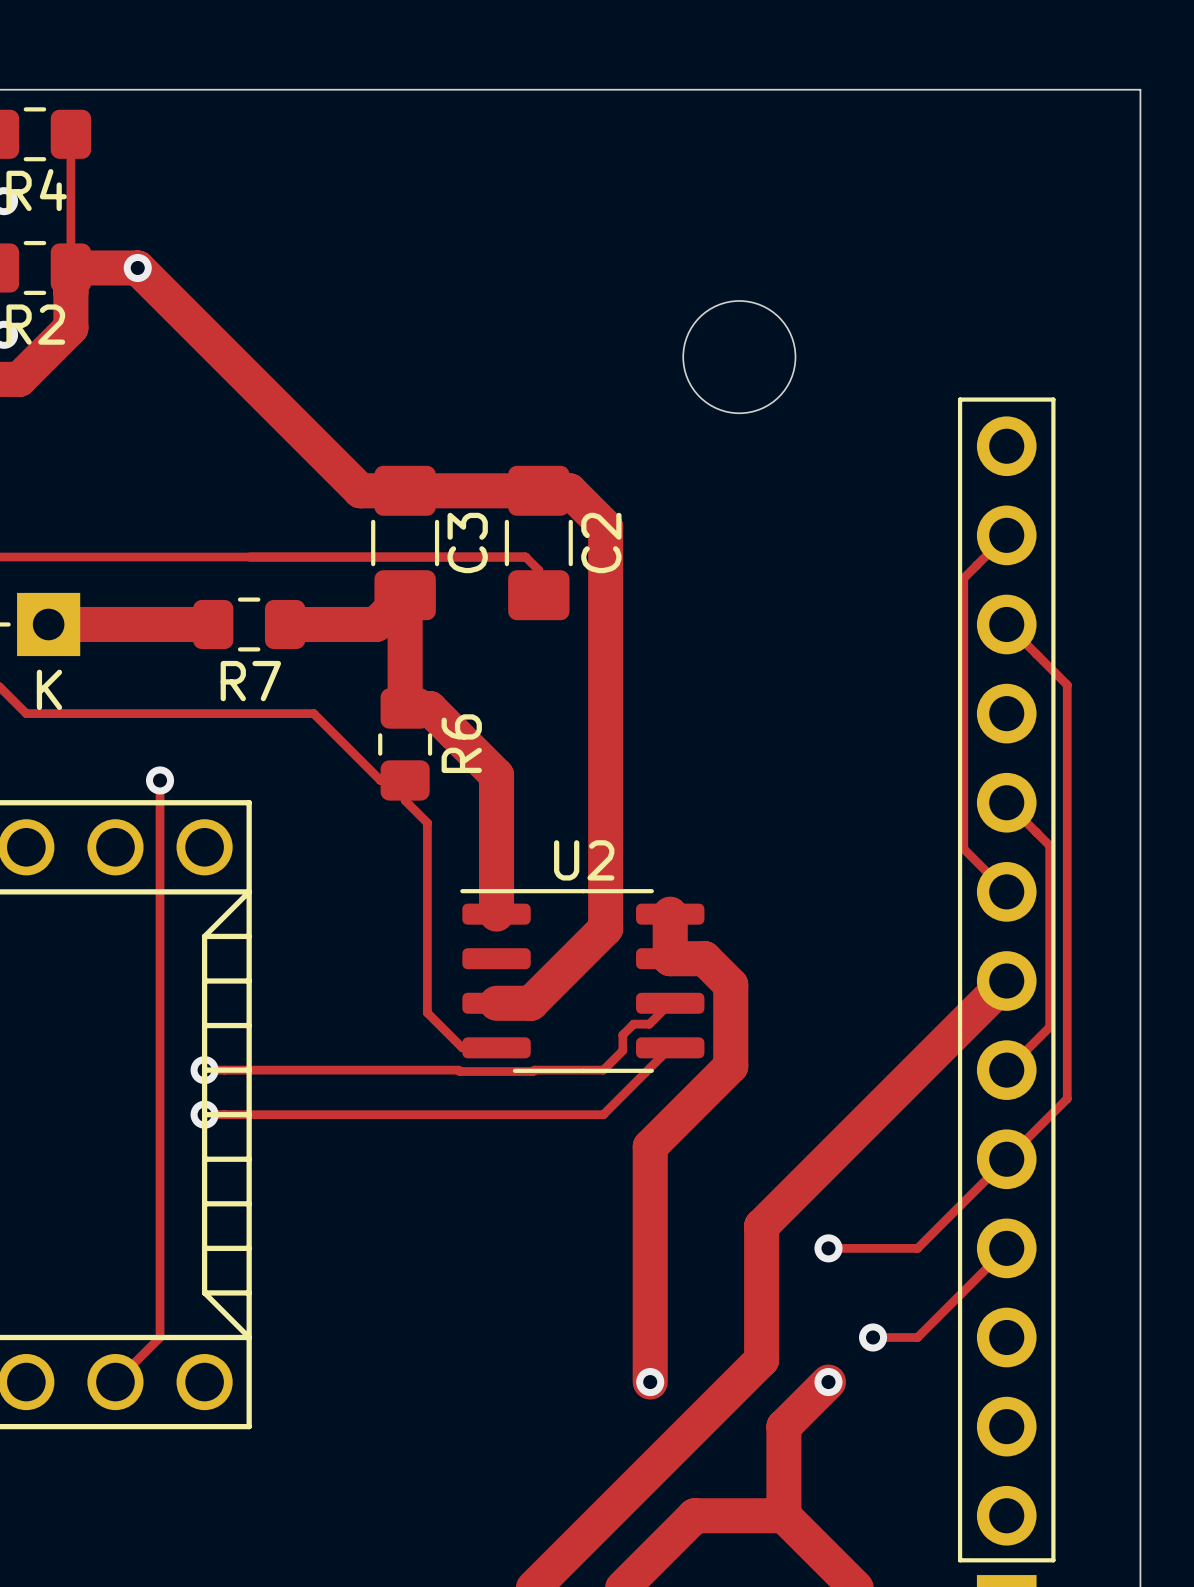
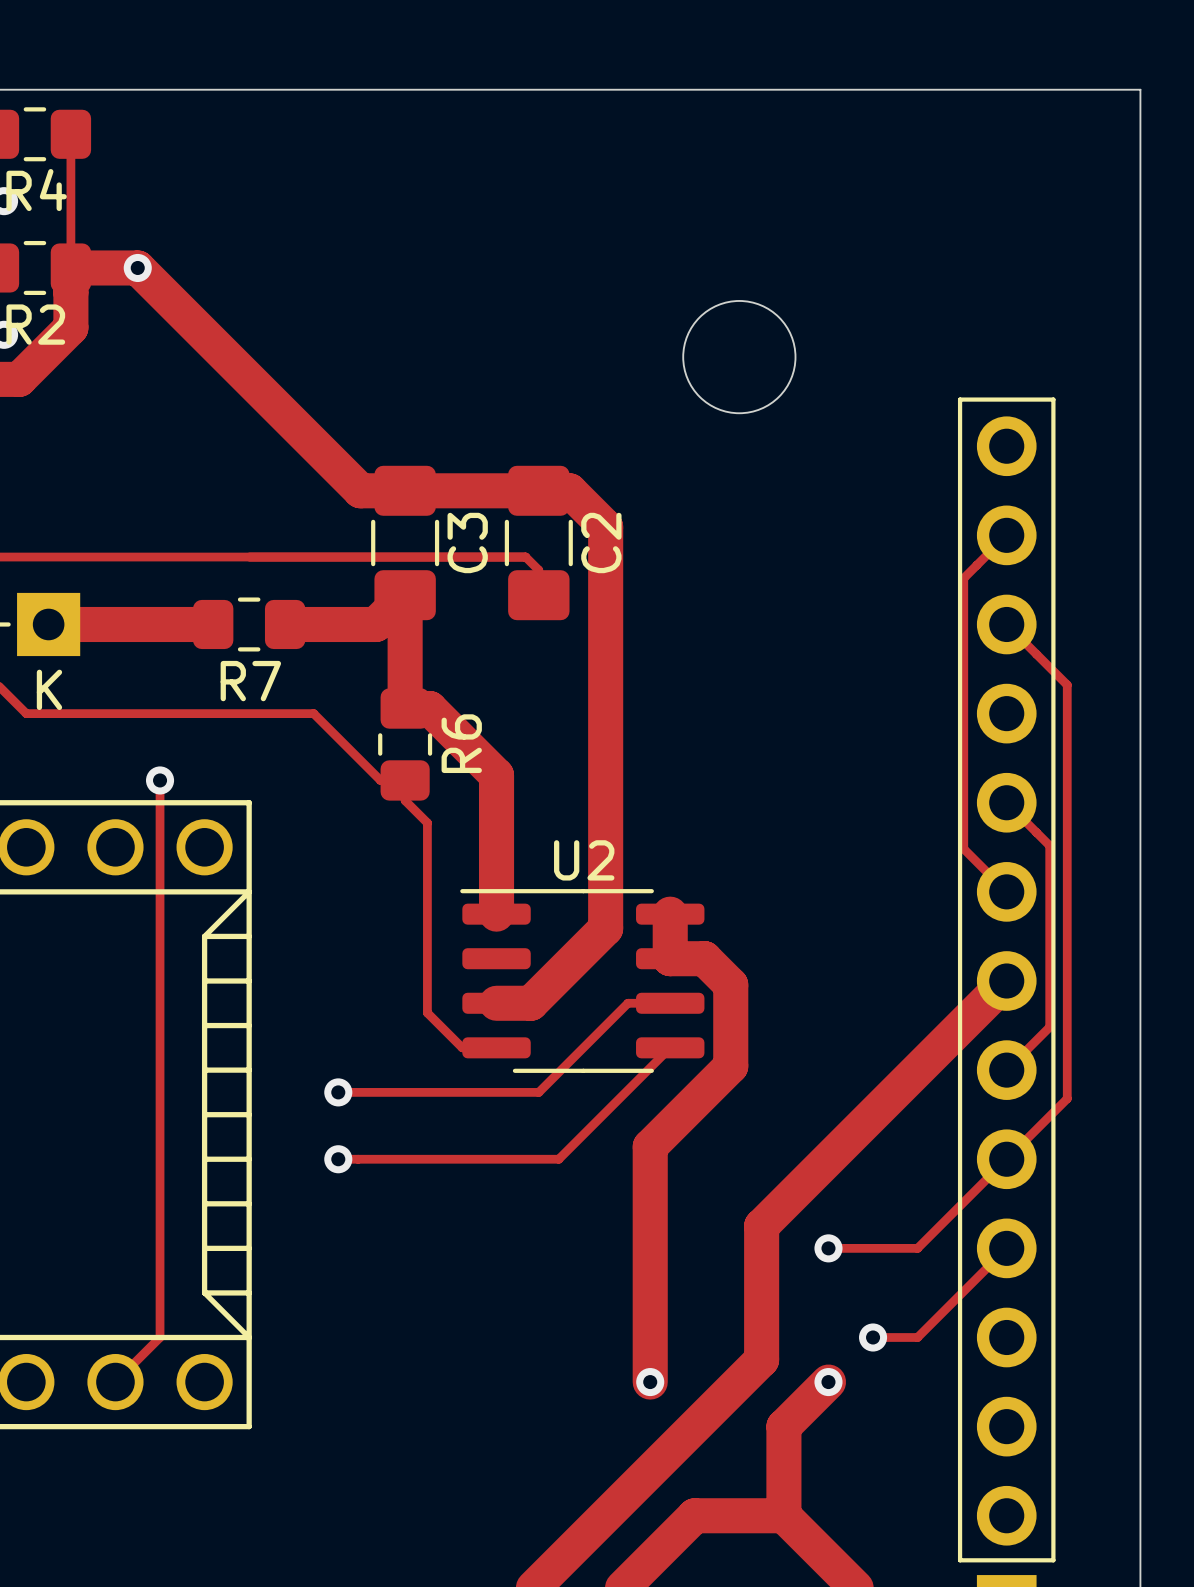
track: (670, 1003) (649, 1024) (633, 1024) (622, 1034) (622, 1050) (603, 1070) (204, 1070) -> (670, 1003) (627, 1003) (538, 1092) (338, 1092)
via: (204, 1070) -> none
via: none -> (338, 1092)
track: (204, 1114) (603, 1114) -> (338, 1159) (558, 1159) (603, 1114)
via: (204, 1114) -> none
via: none -> (338, 1159)

